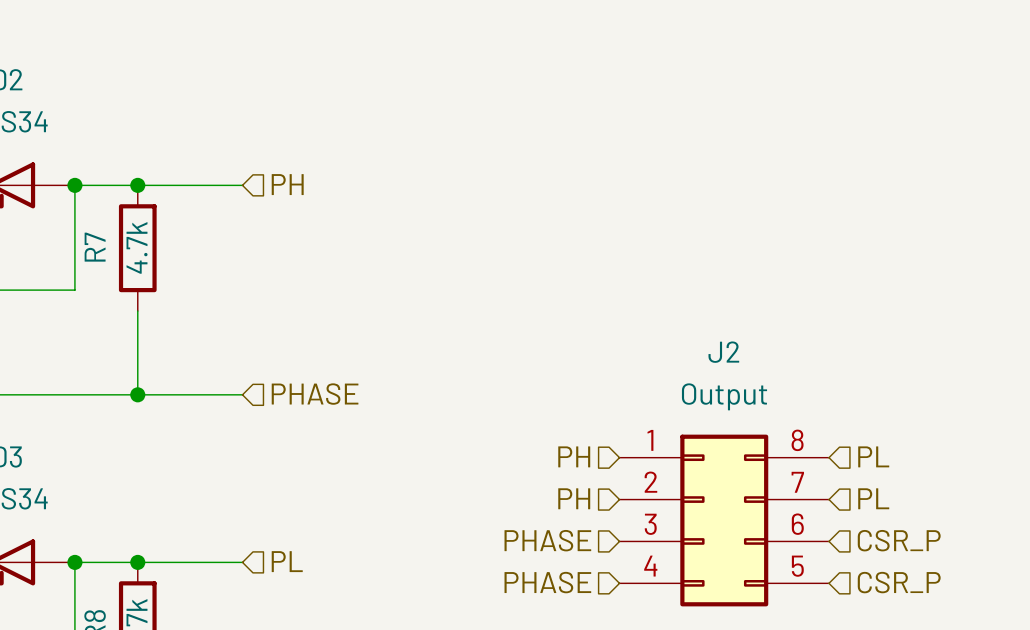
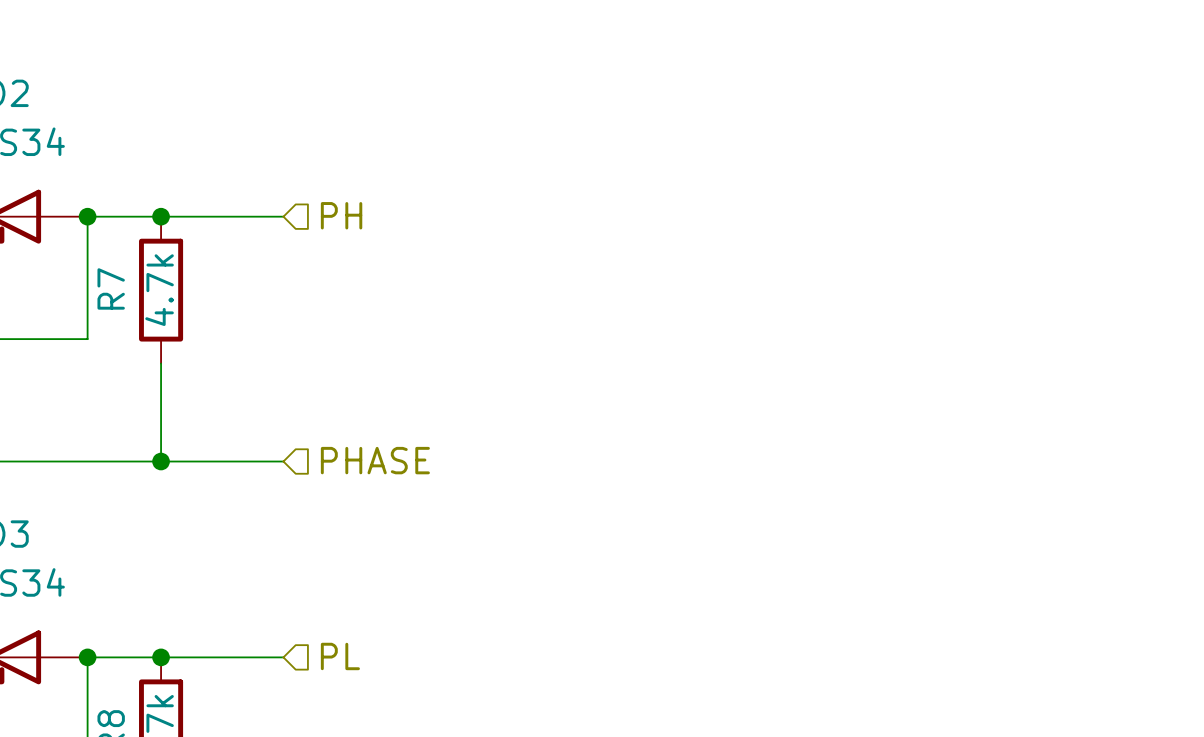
hierarchical label: PH (574, 456) -> none
hierarchical label: PL (873, 456) -> none
hierarchical label: PH (574, 498) -> none
hierarchical label: PL (873, 498) -> none
J2: Output (724, 520) -> none
hierarchical label: PHASE (547, 540) -> none
hierarchical label: CSR_P (899, 540) -> none
hierarchical label: PHASE (547, 582) -> none
hierarchical label: CSR_P (899, 582) -> none

